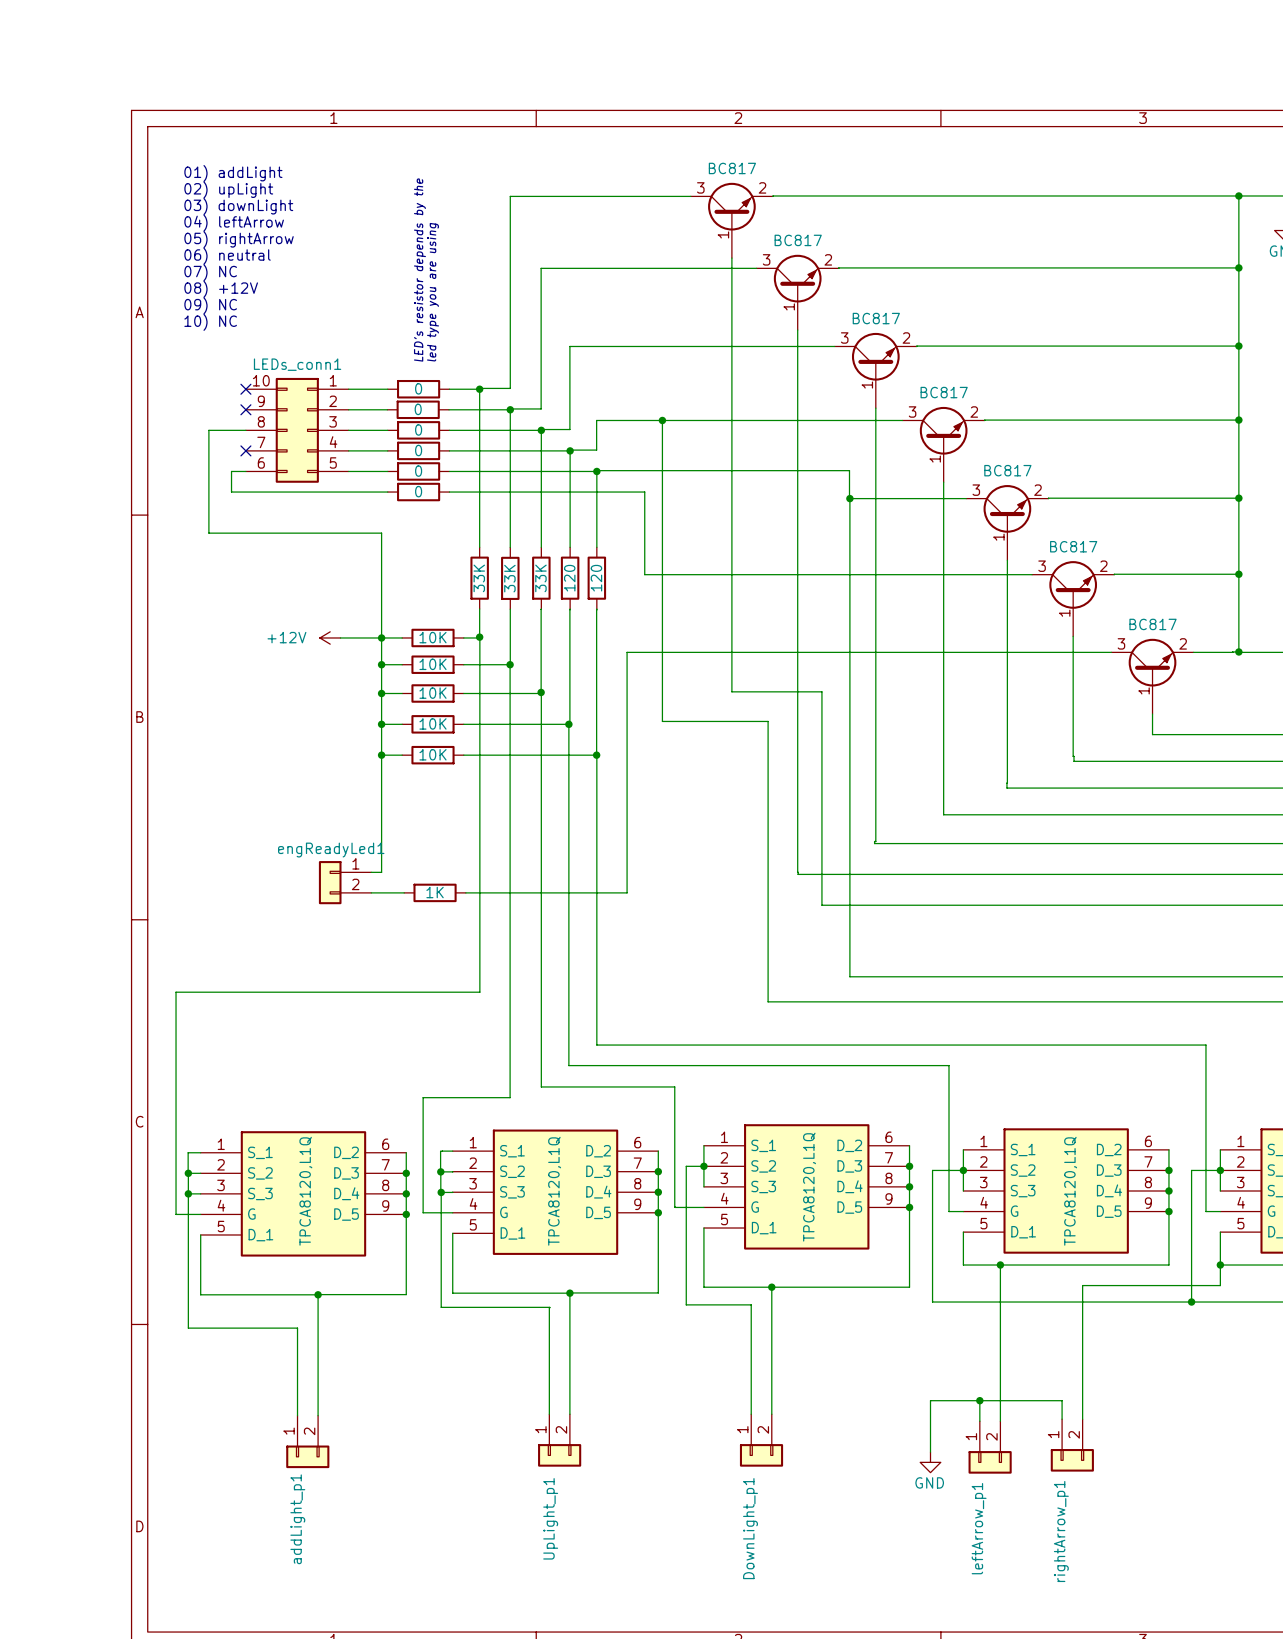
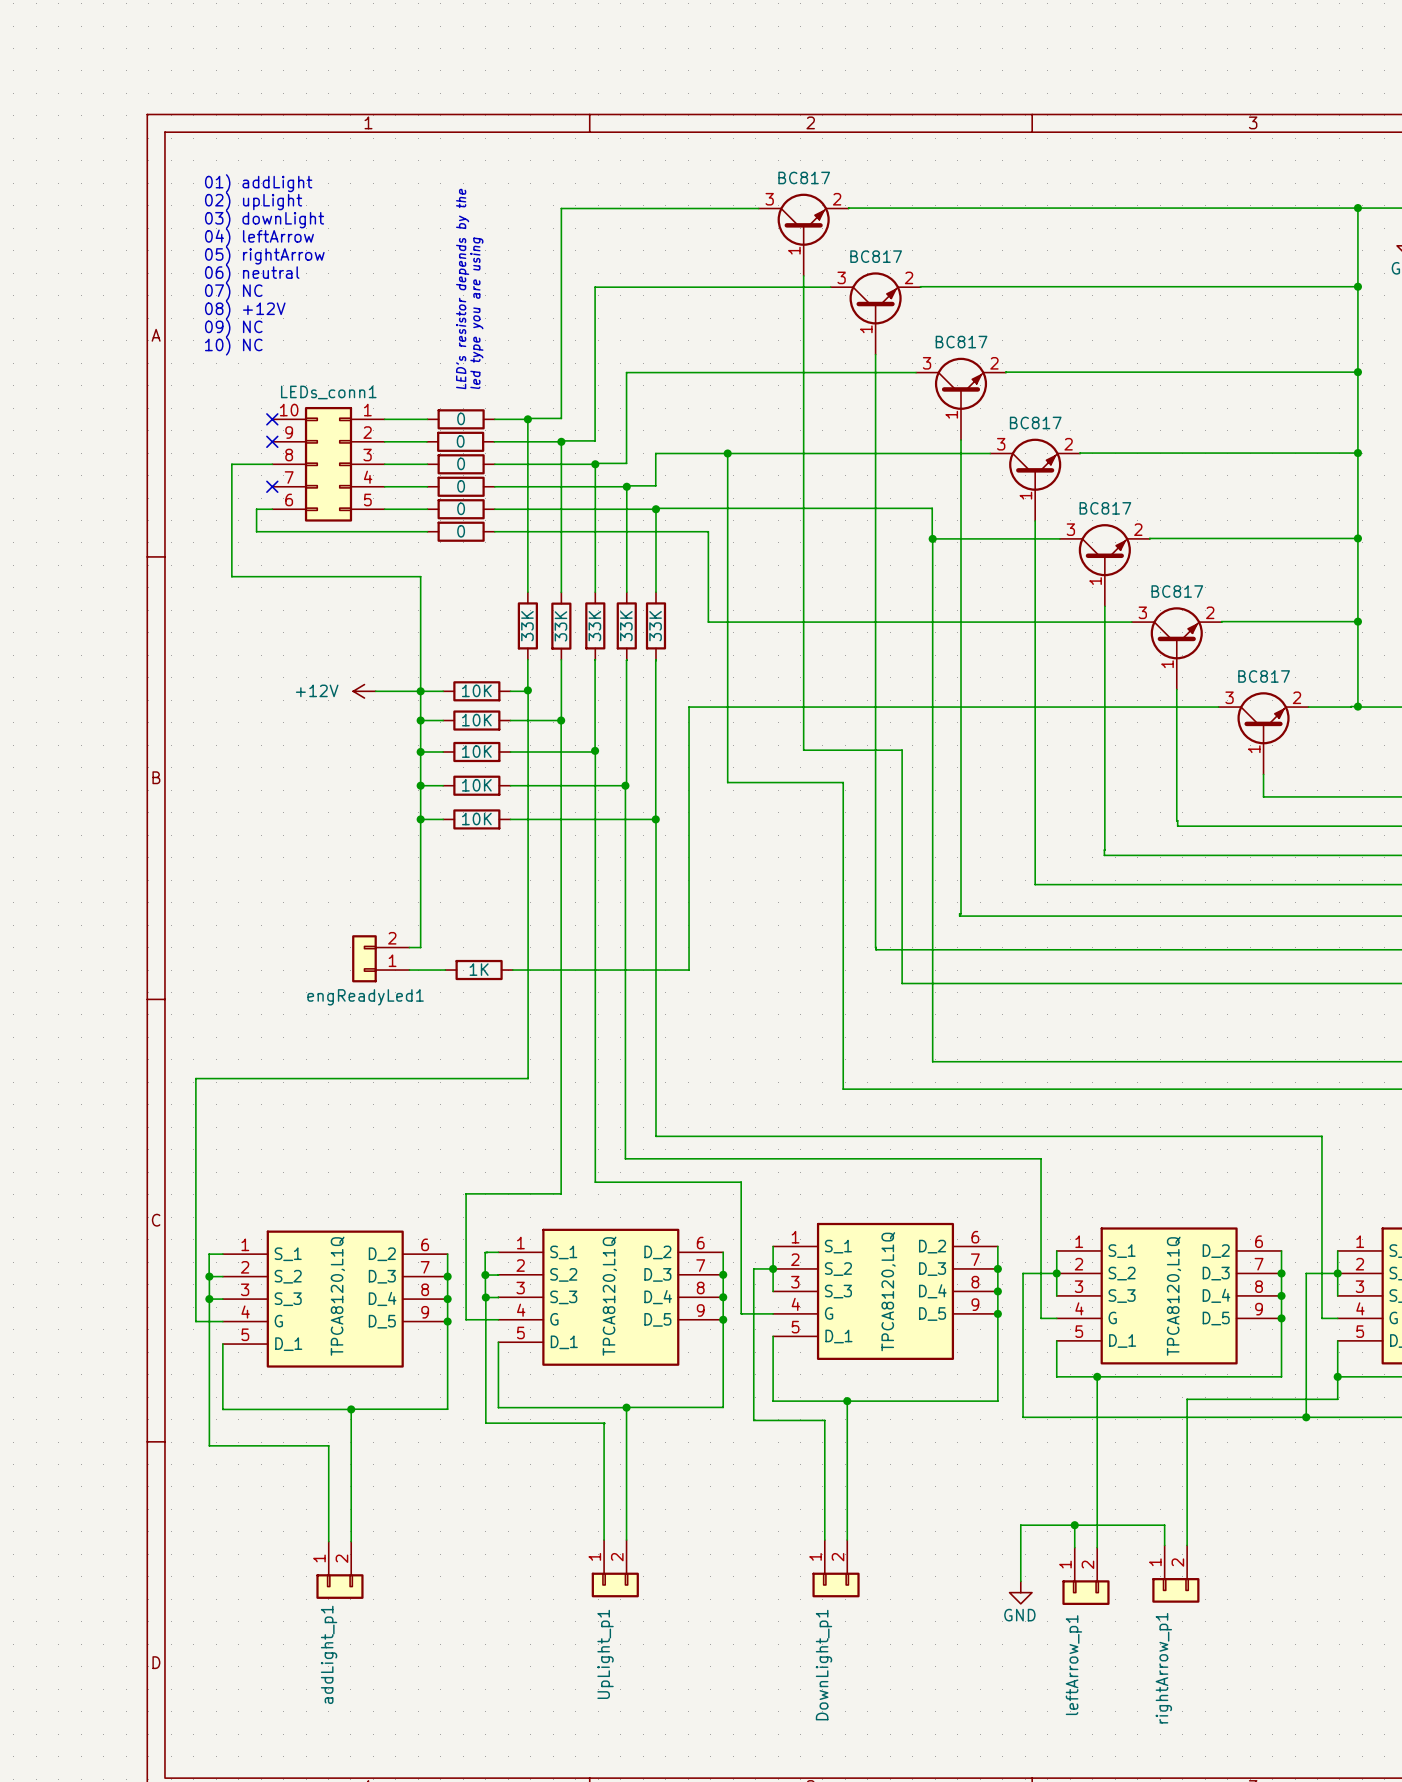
part value: 120 (569, 578) -> 33K (626, 626)
part value: 120 (596, 578) -> 33K (655, 626)
engReadyLed1 flip: as is (330, 882) -> up-down (364, 958)

